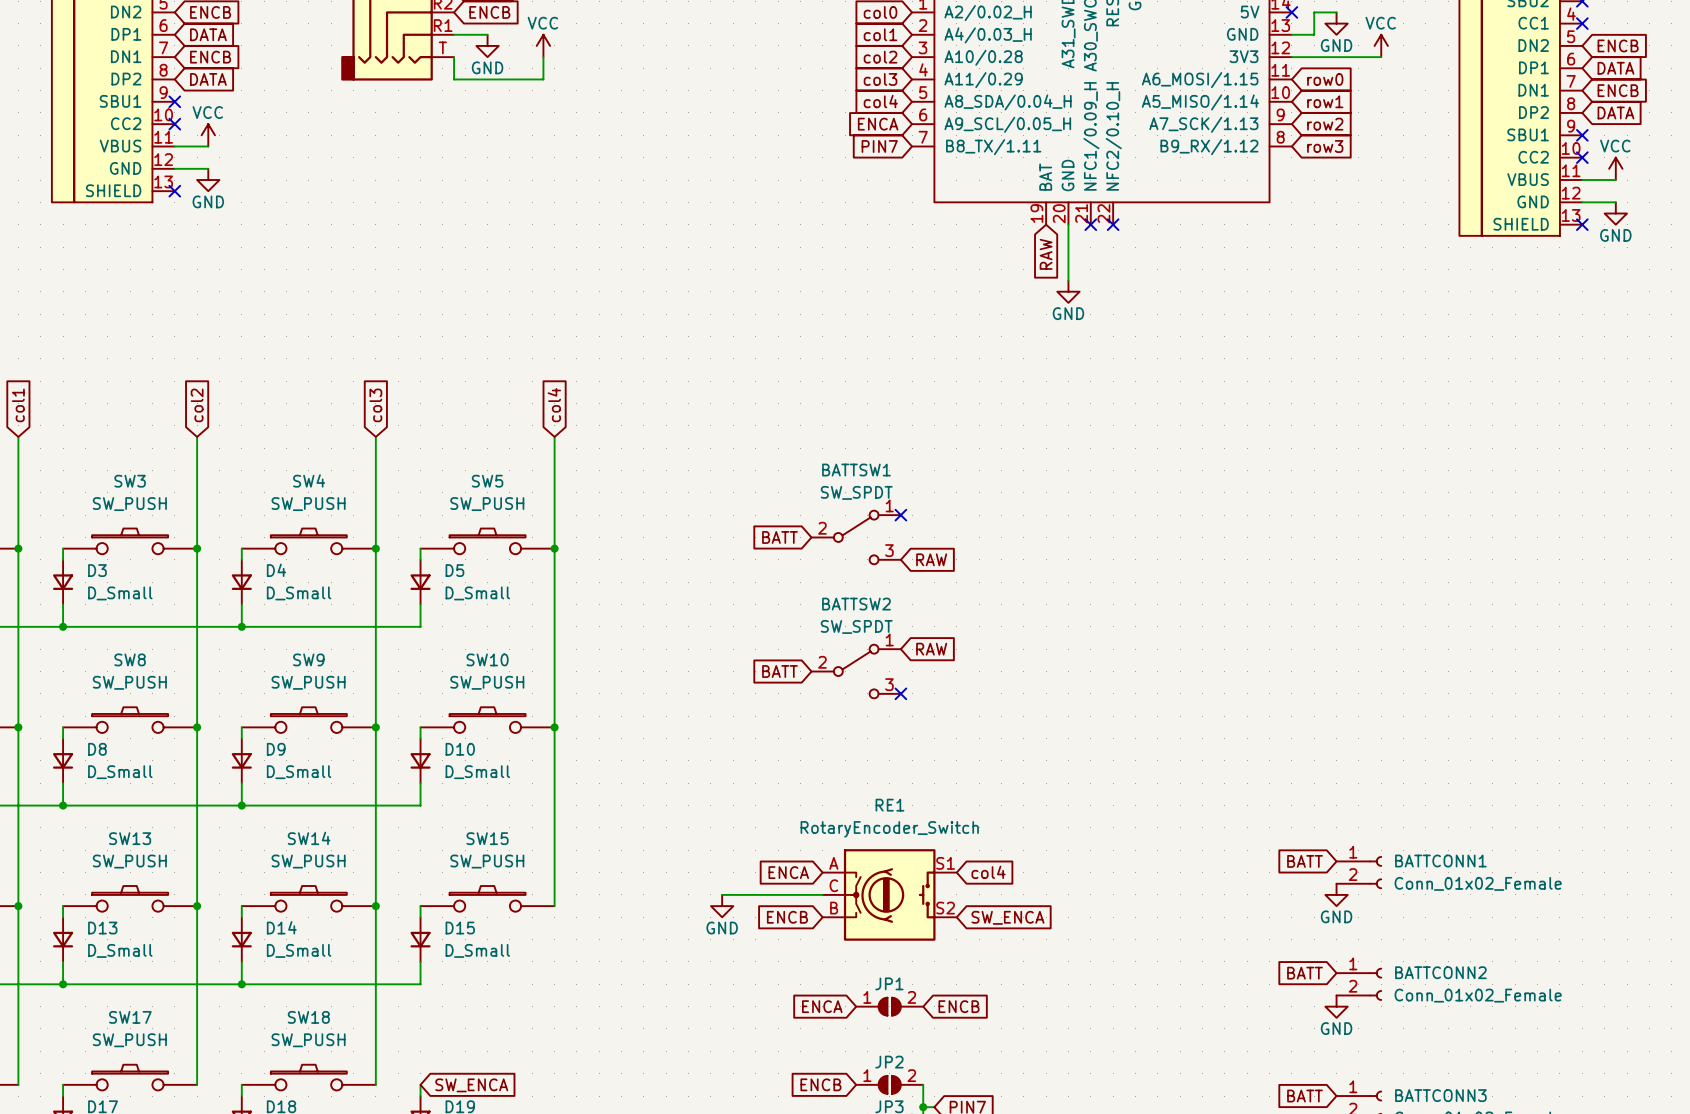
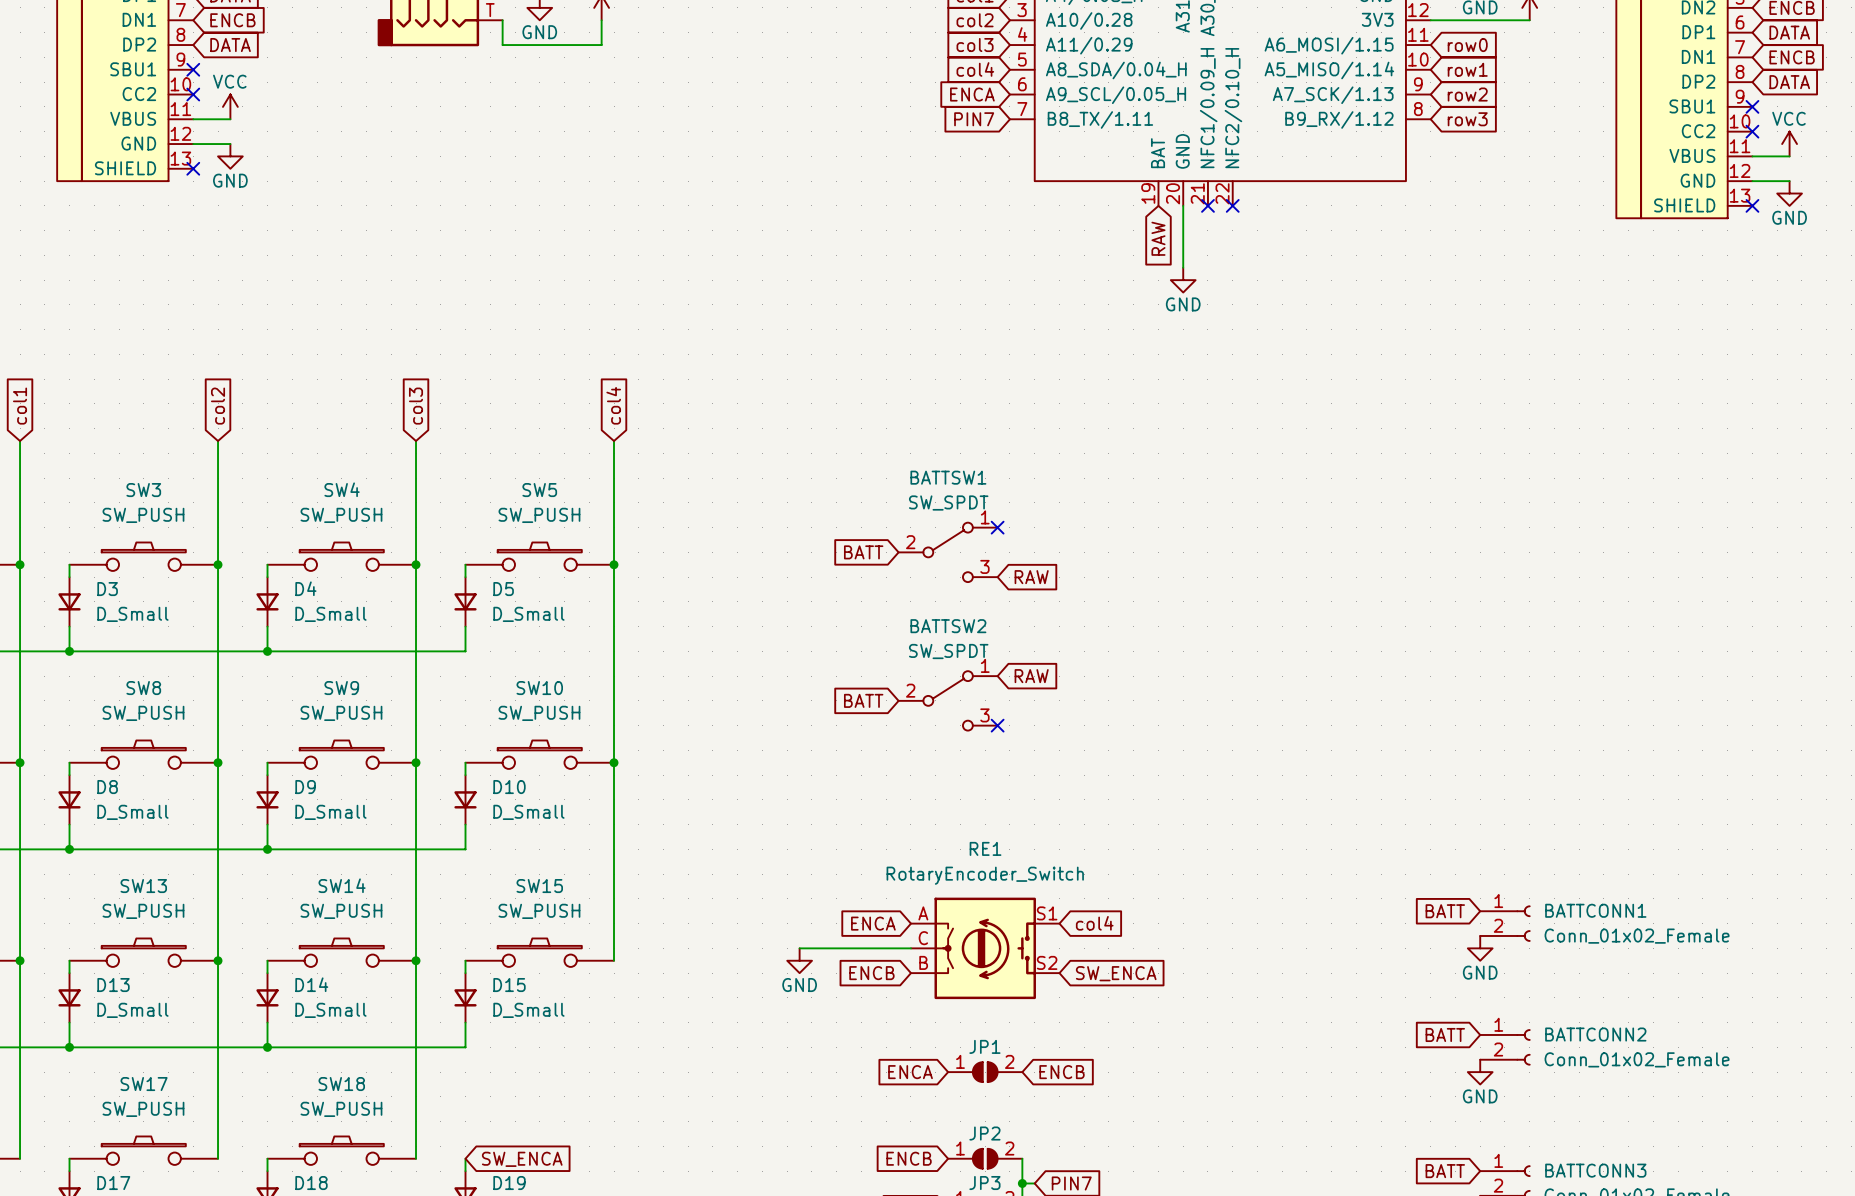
RE1 symbol: [822, 849, 957, 941] -> [910, 897, 1060, 1000]

